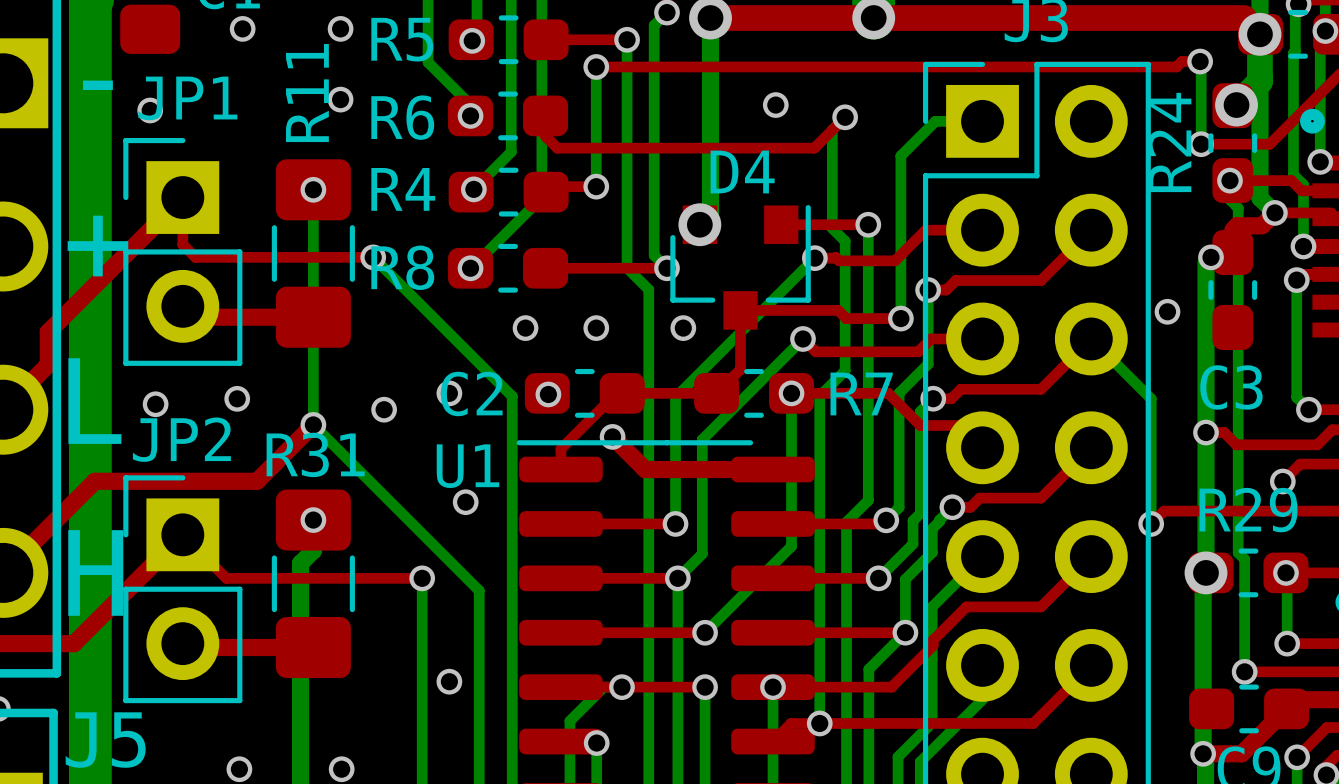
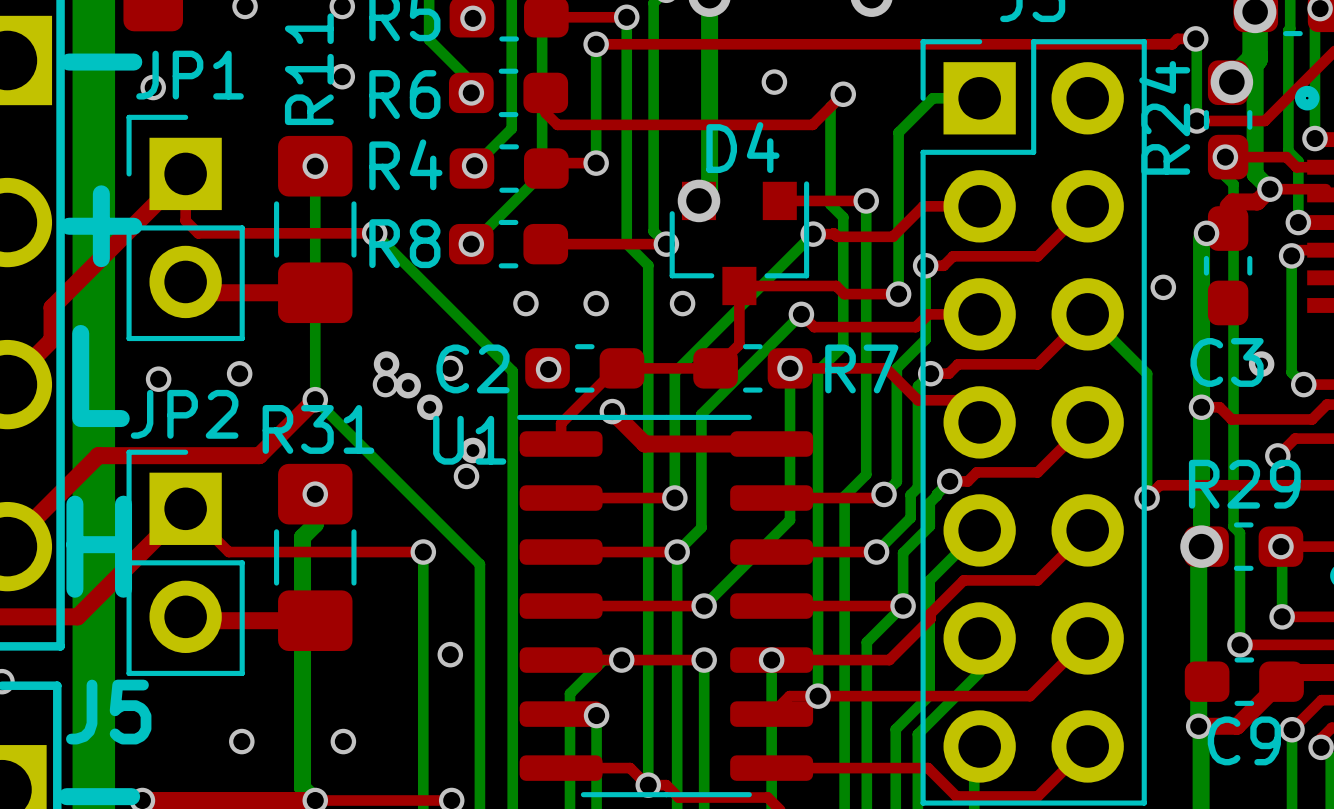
via: none -> (386, 364)
via: none -> (1261, 364)
via: none -> (408, 385)
via: none -> (429, 407)
via: none -> (473, 450)

